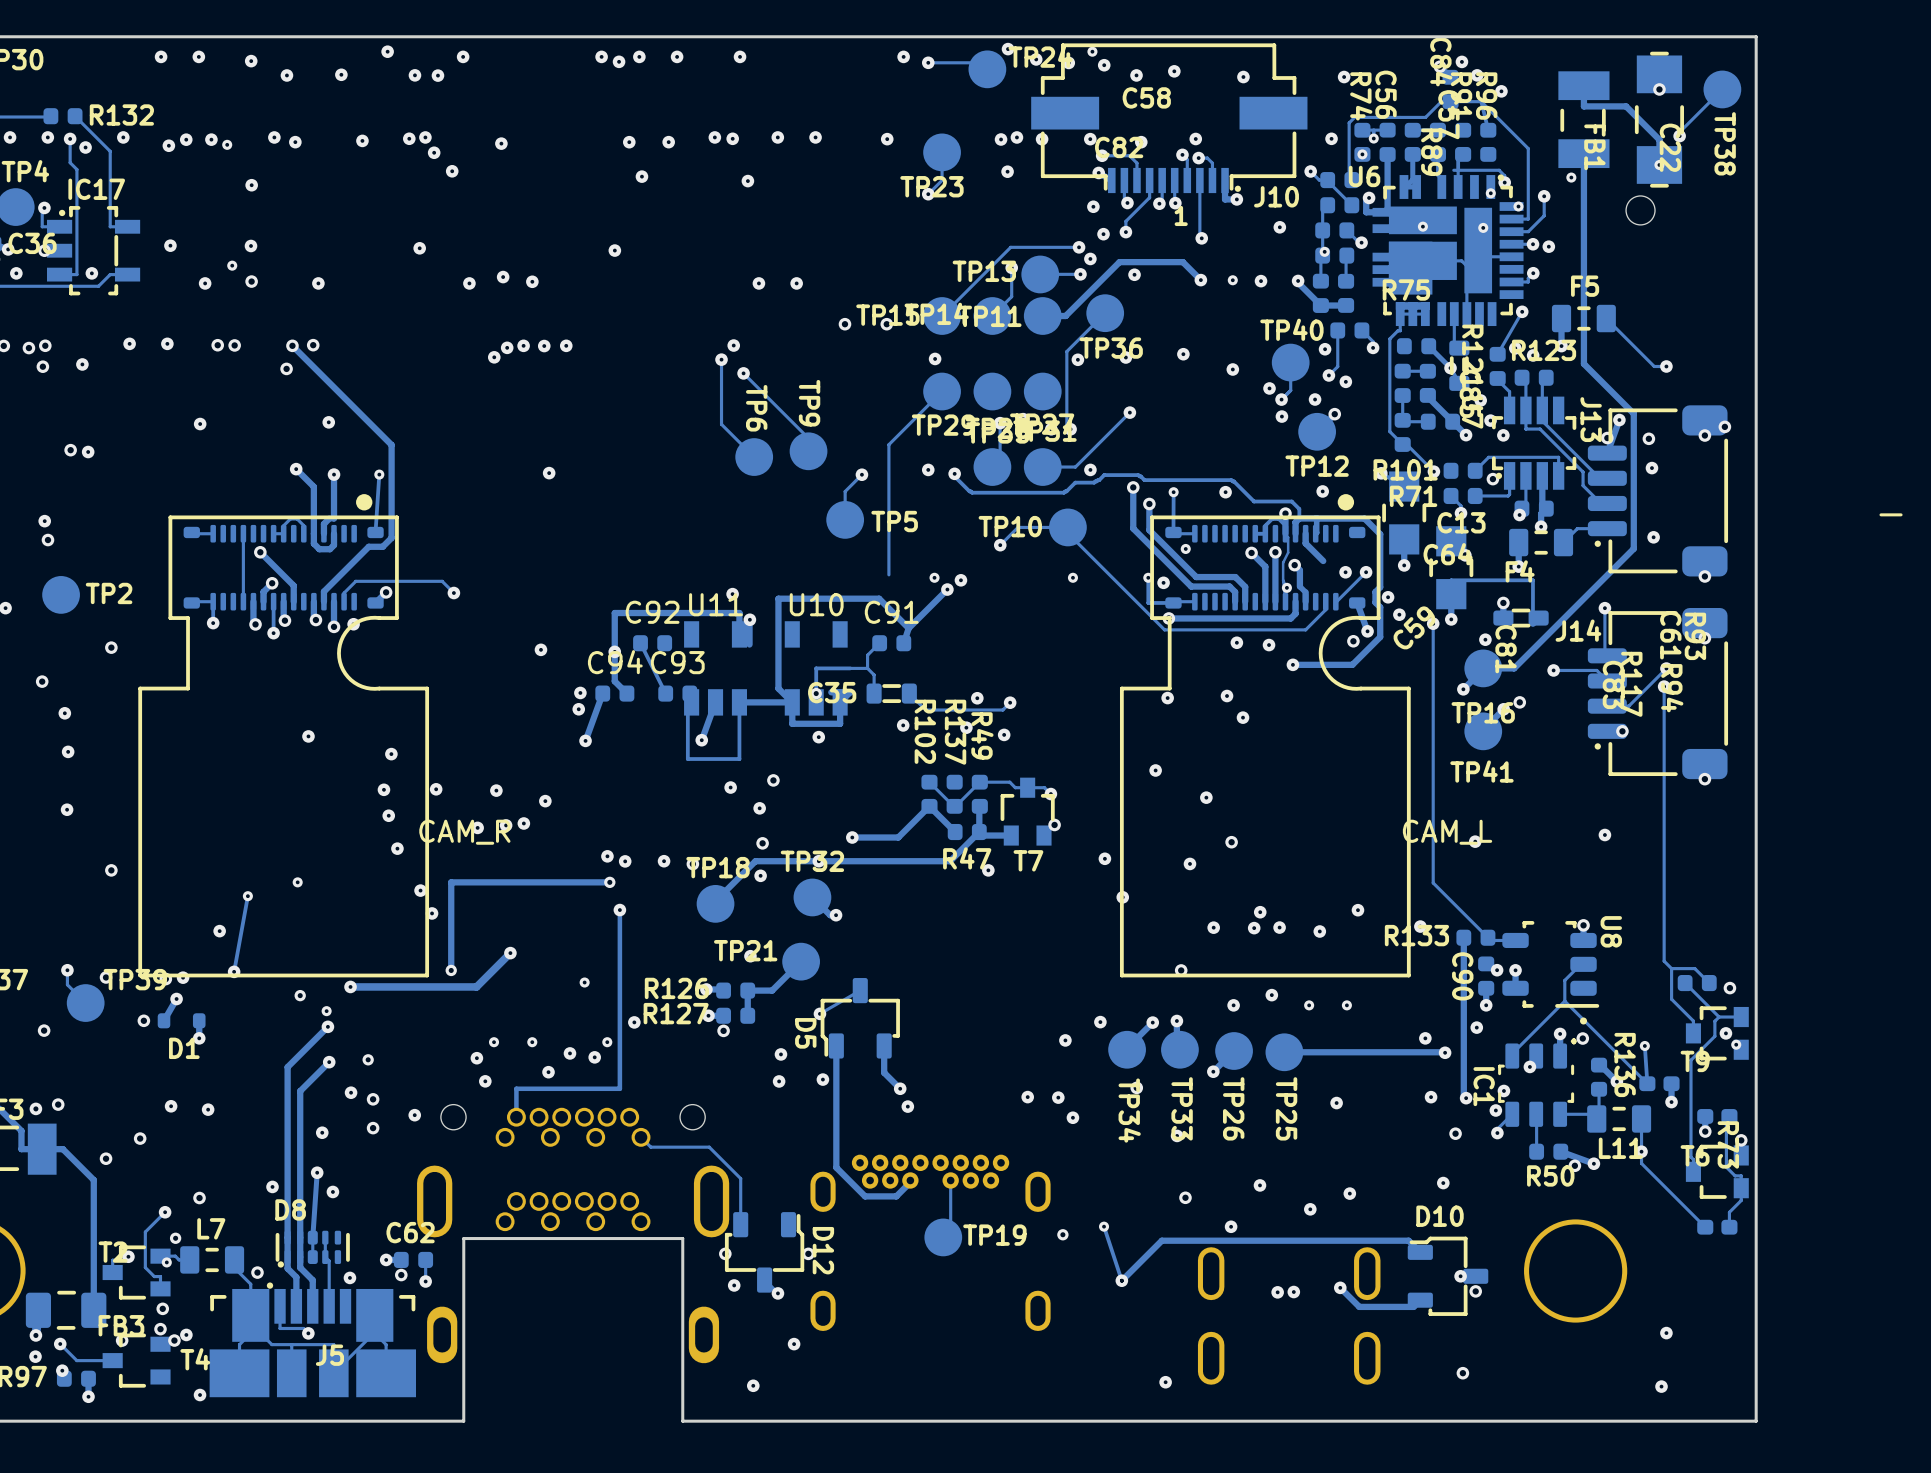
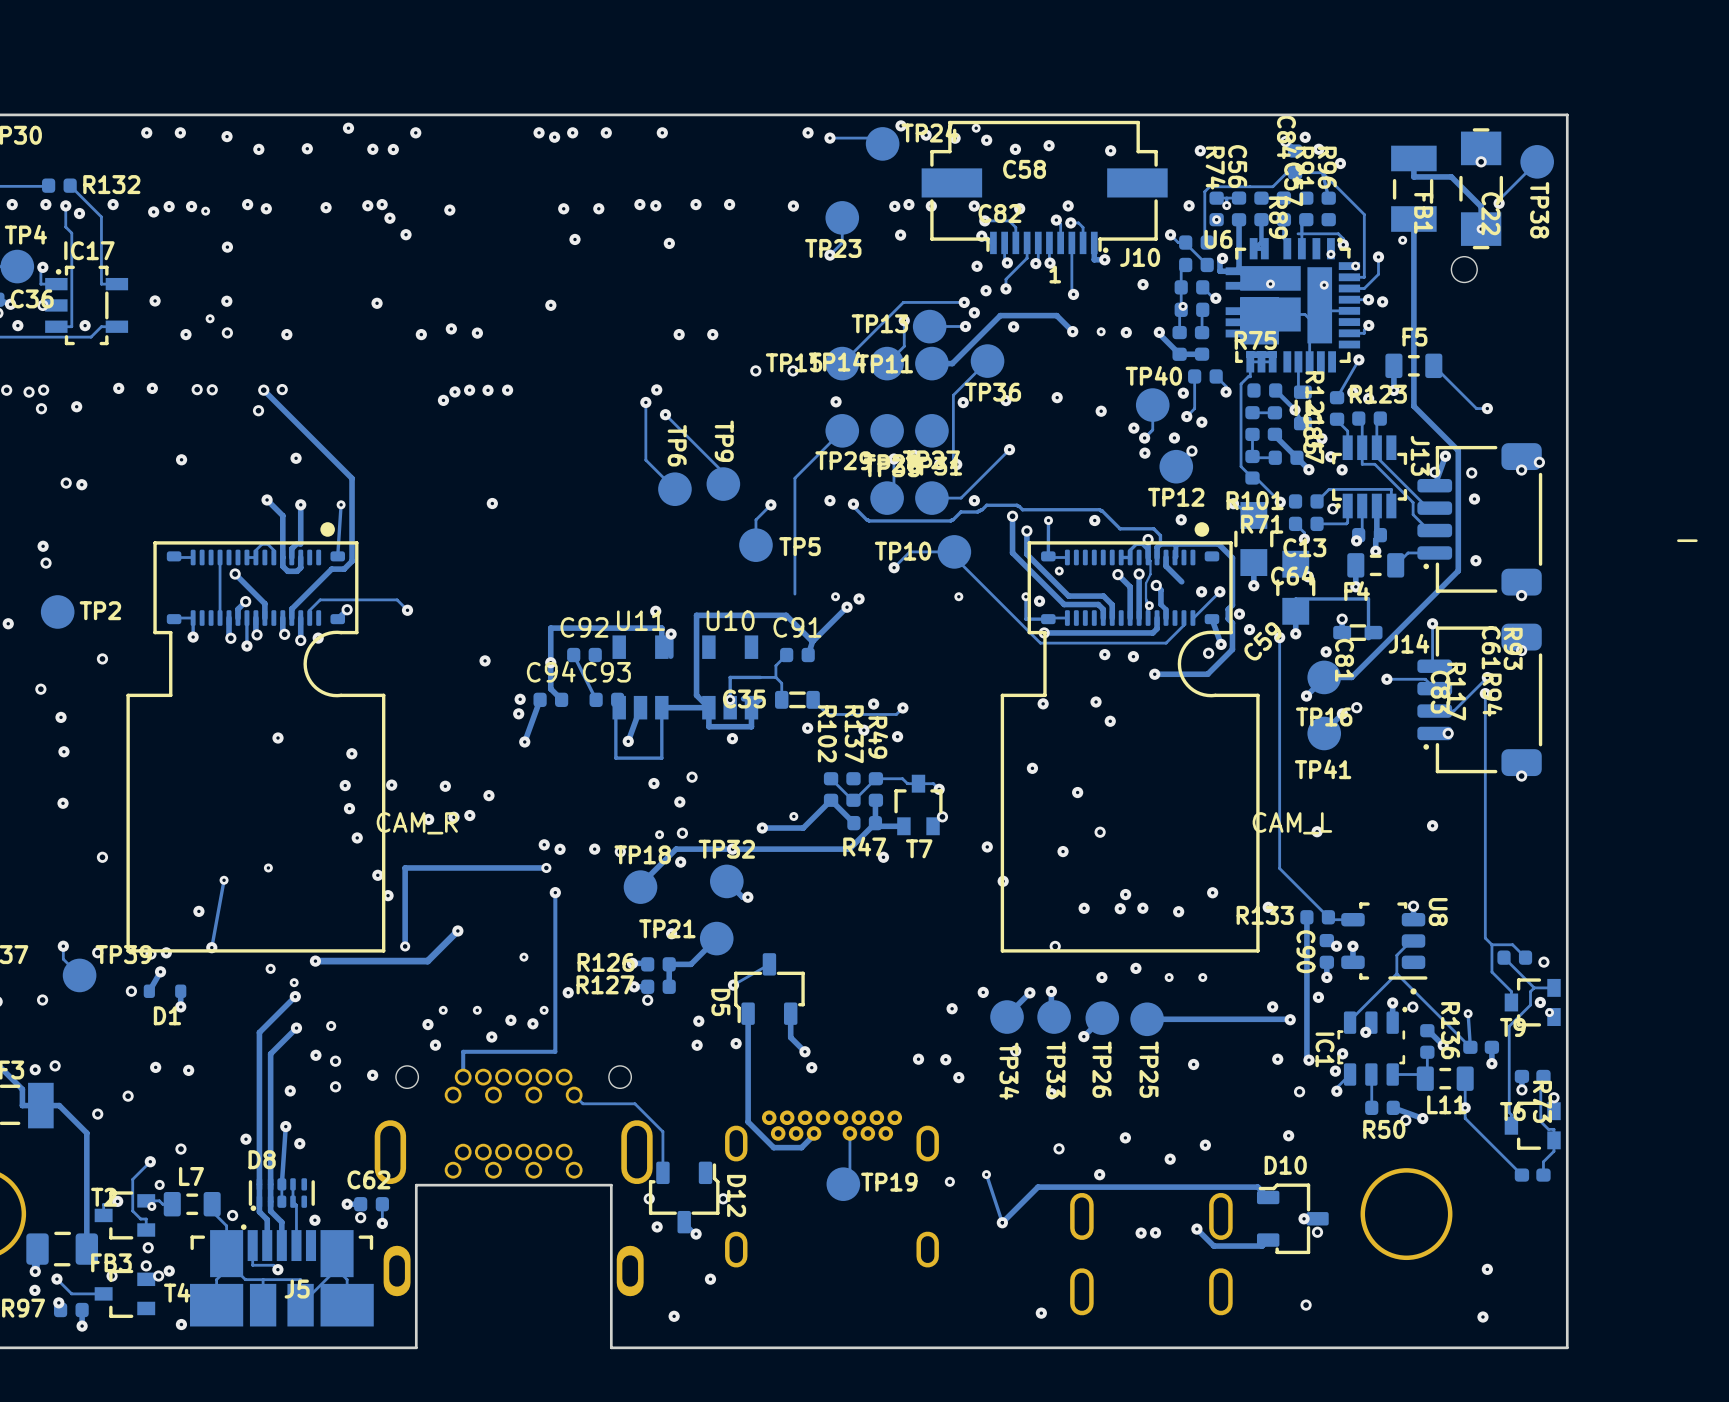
via: none -> (793, 816)
via: none -> (659, 834)

